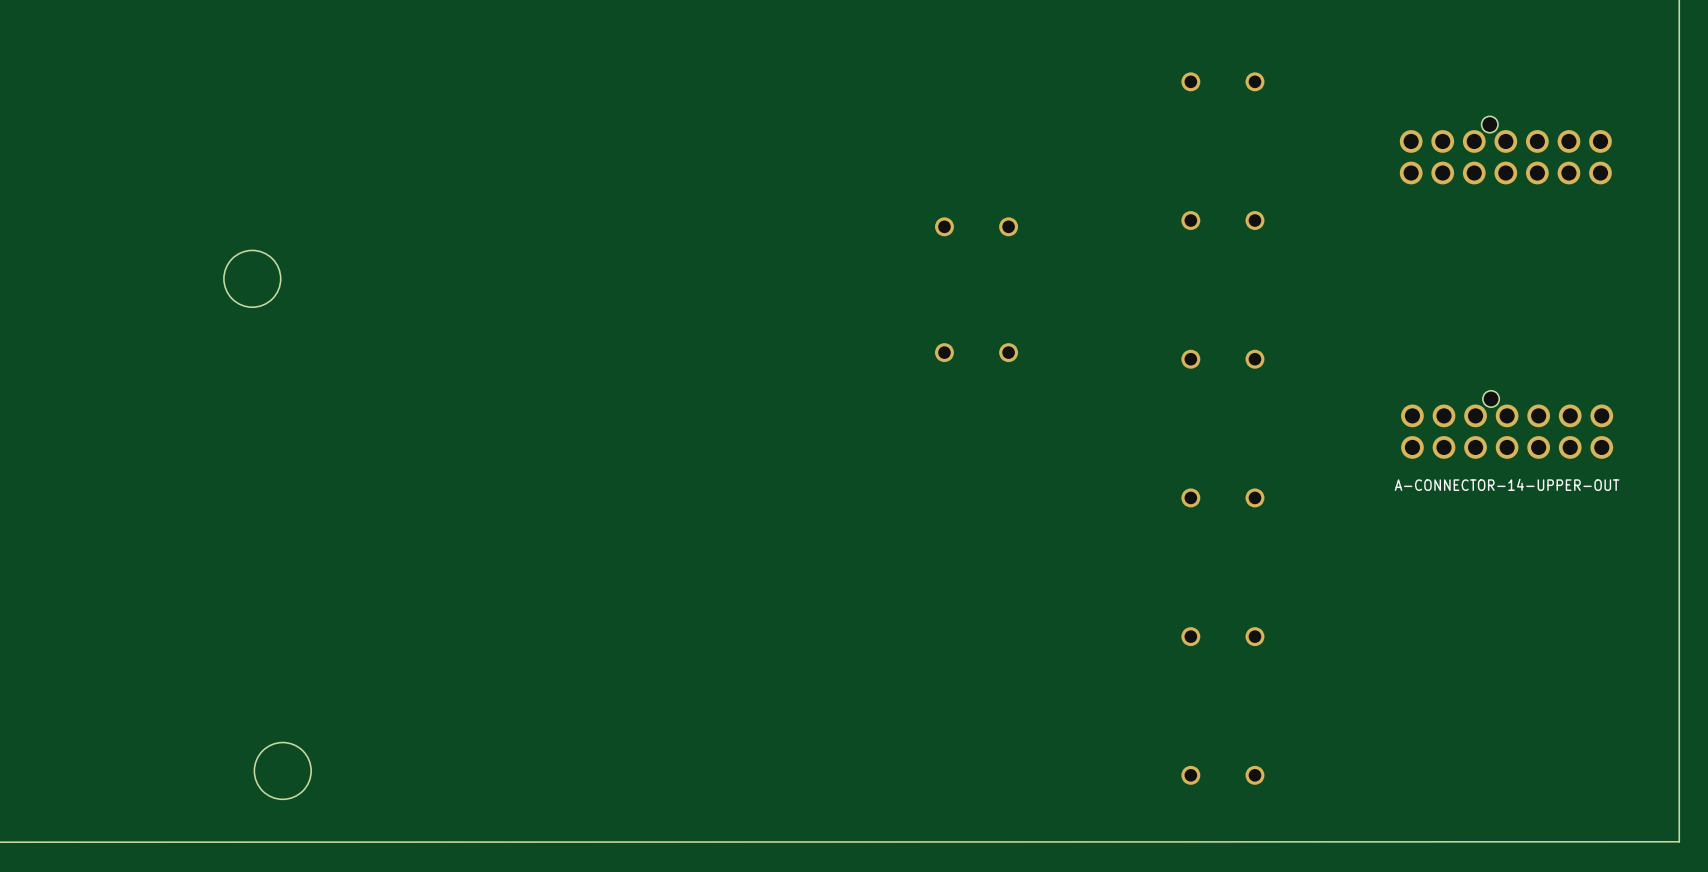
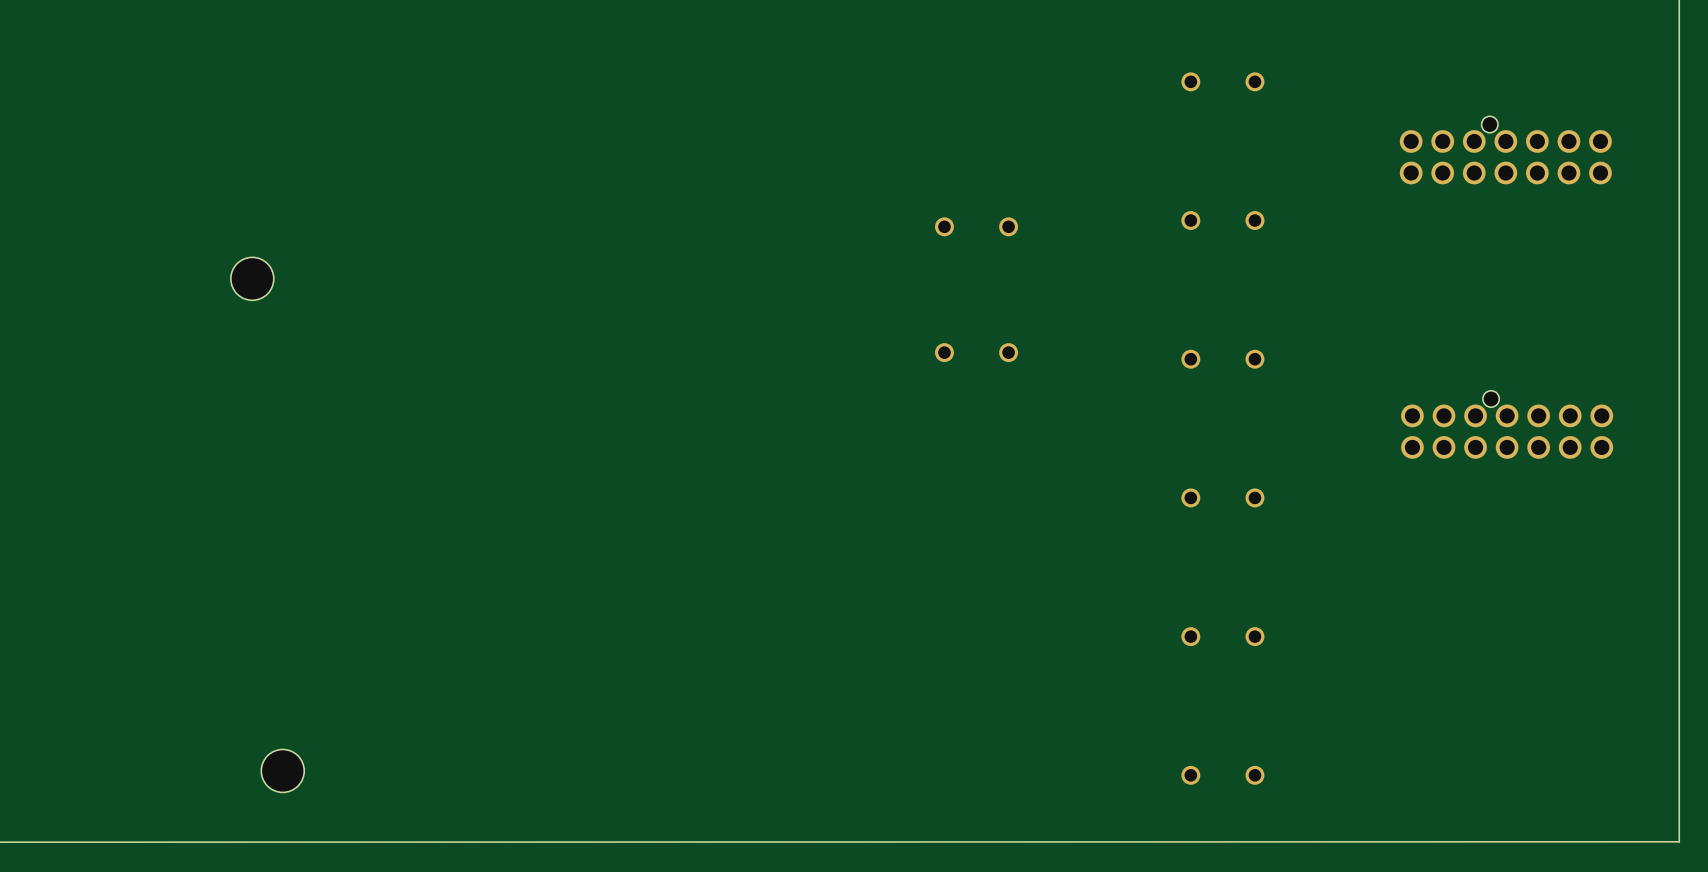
round board edge: [223, 250, 281, 308] -> none
part: none -> (252, 278)
A-CONNECTOR-14-UPPER-OUT name: A-CONNECTOR-14-UPPER-OUT (1507, 484) -> none
round board edge: [254, 742, 312, 800] -> none
part: none -> (282, 770)

